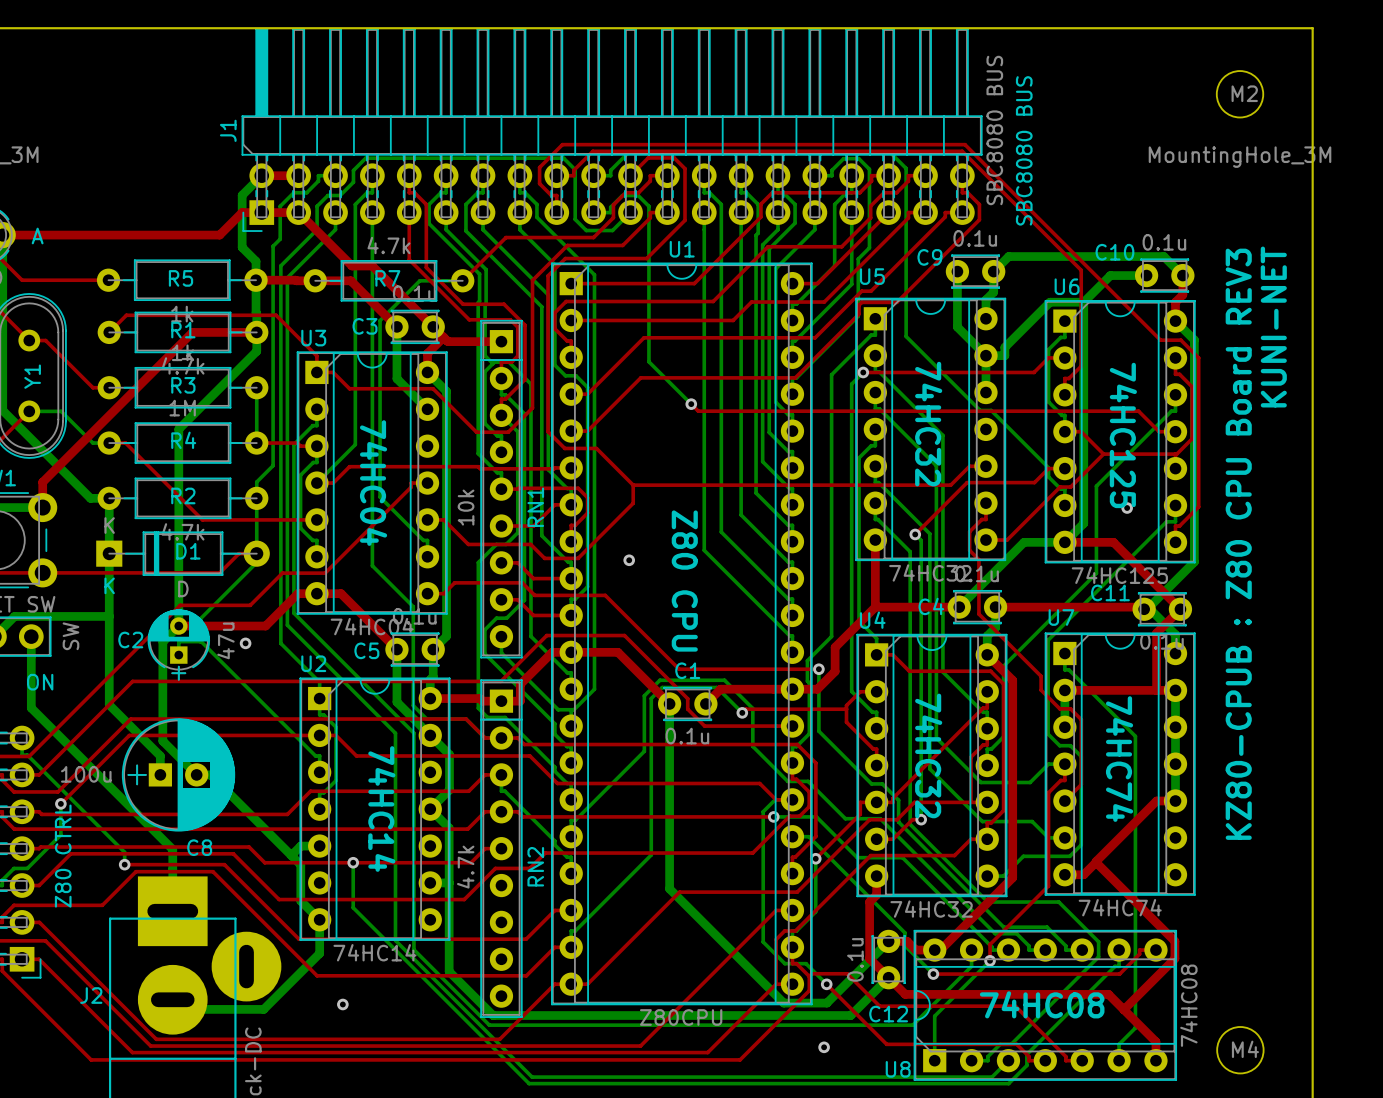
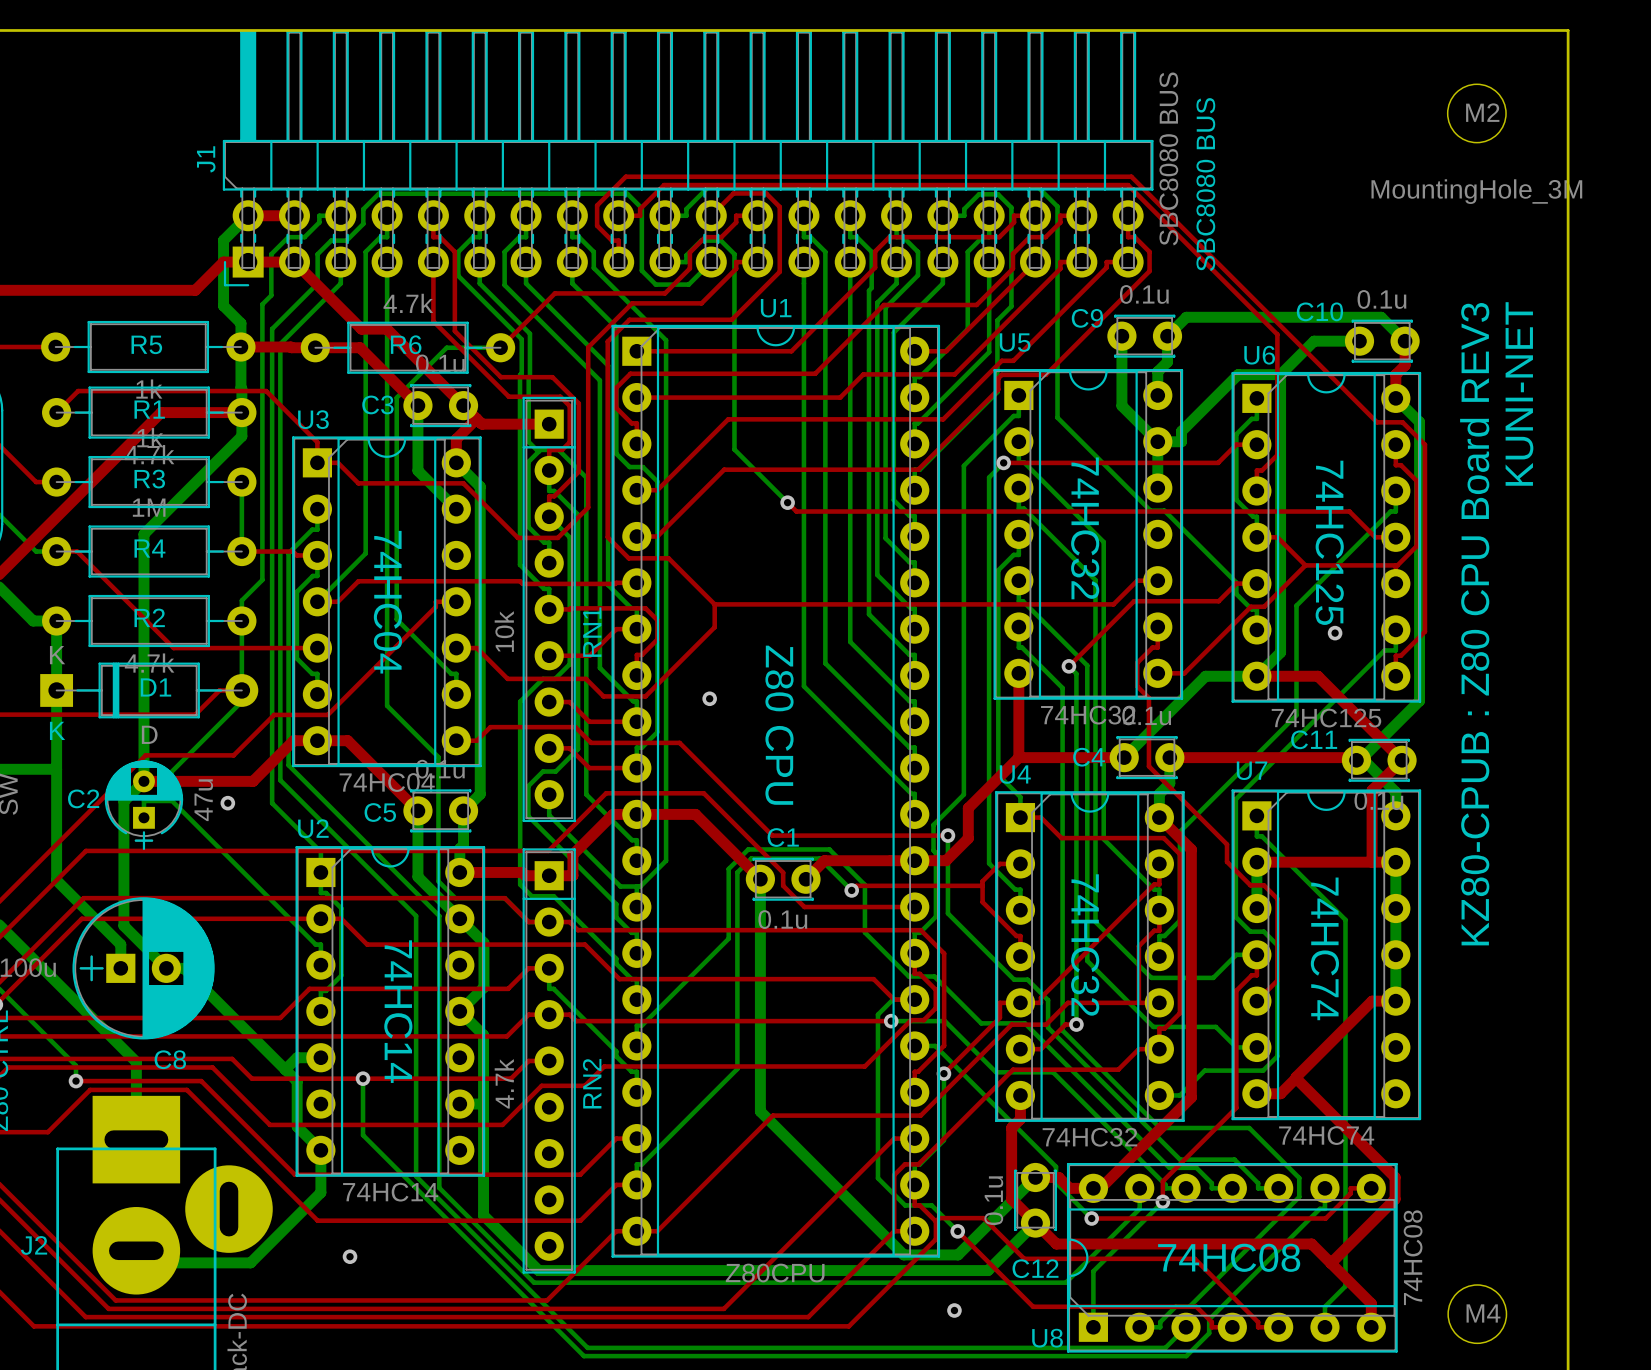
R7 name: R7 (387, 278) -> R6 (406, 344)

